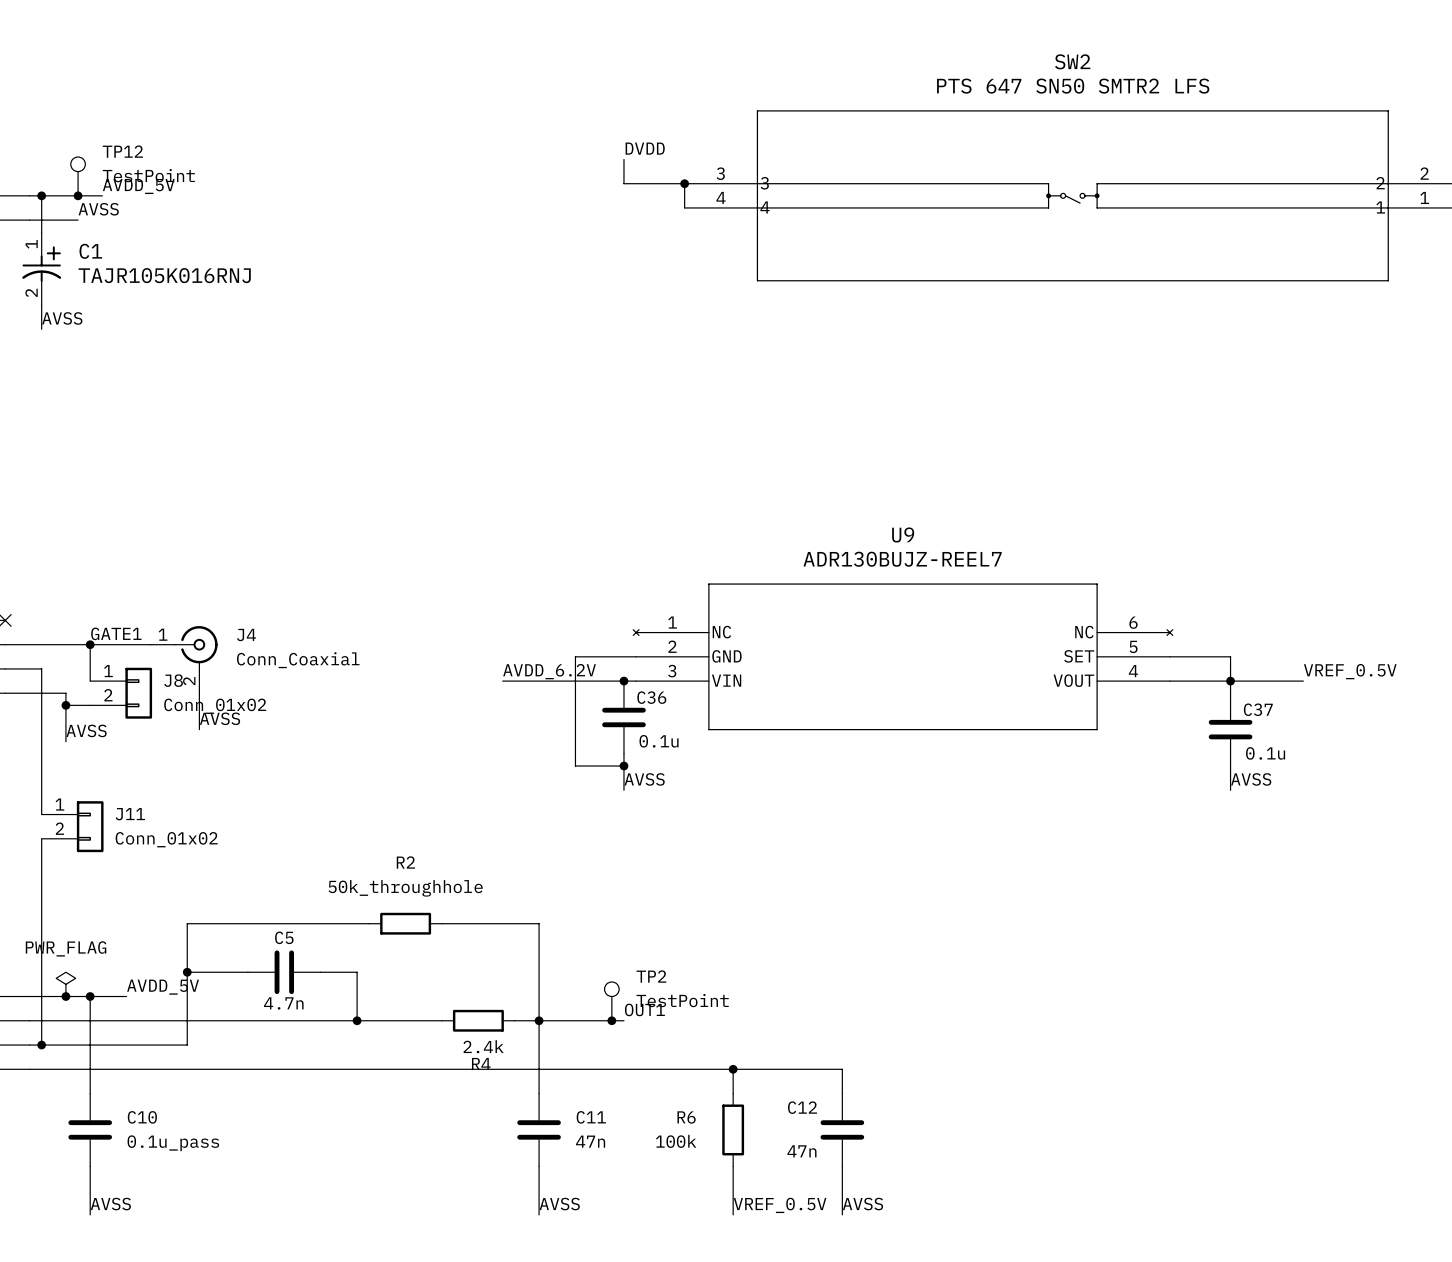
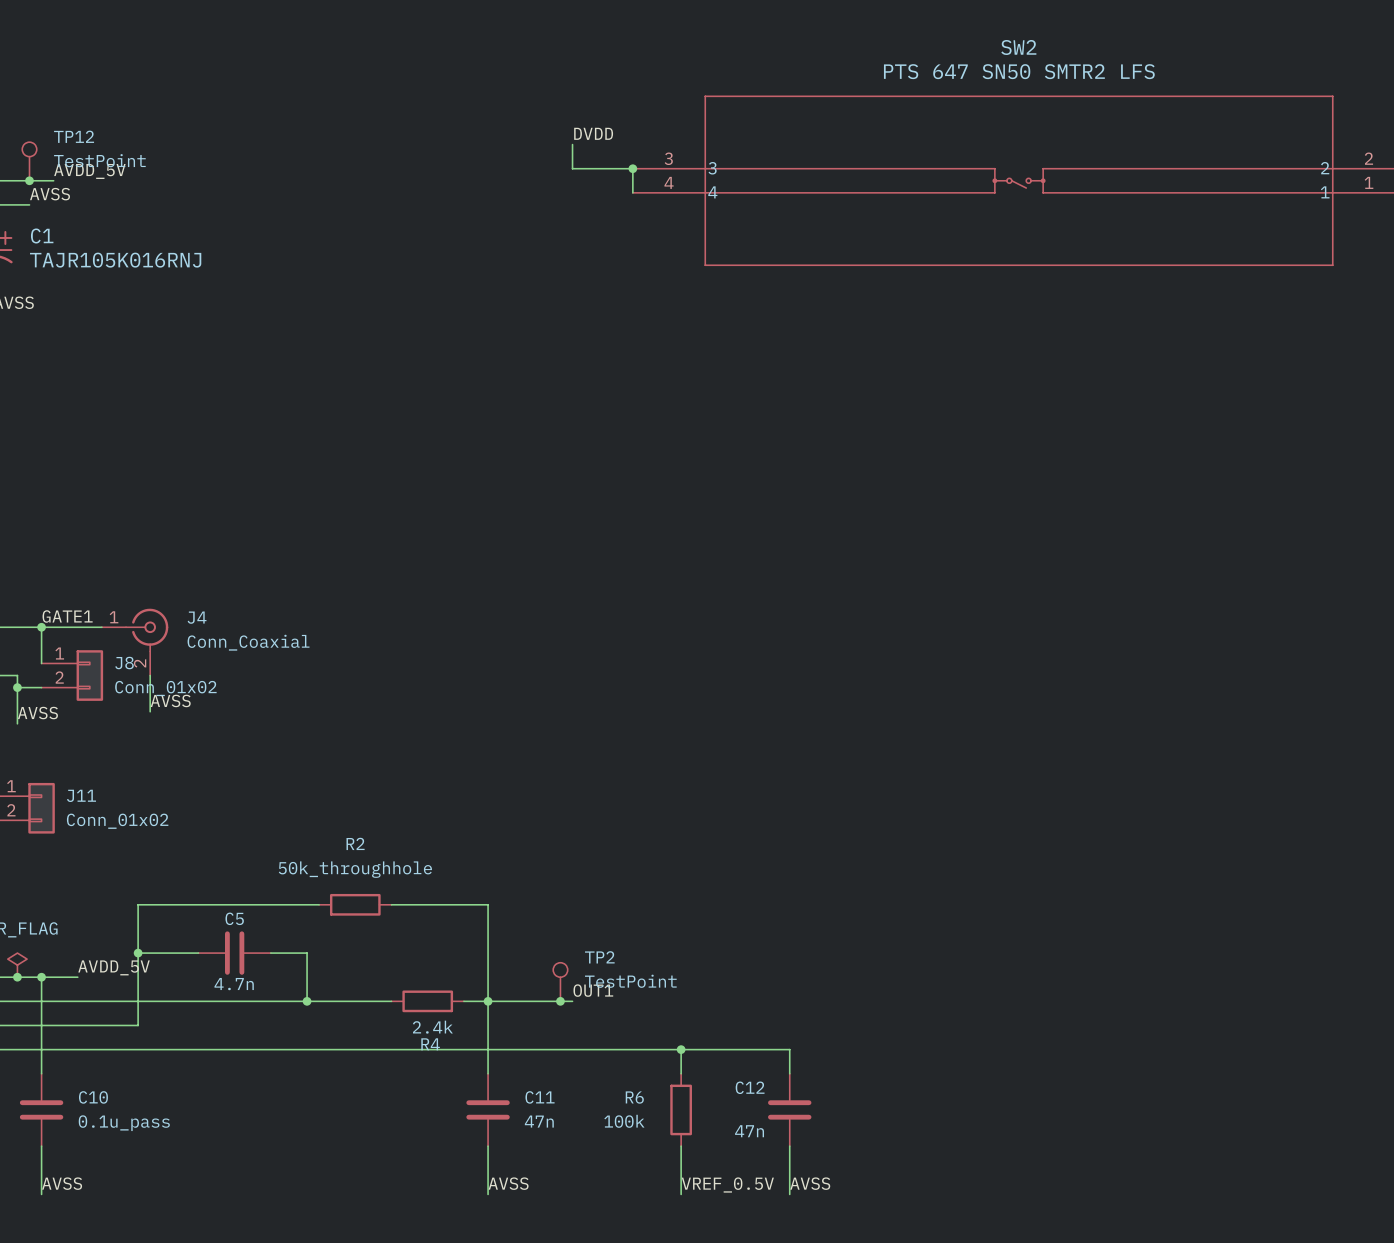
wire: (636, 656) (575, 656) (575, 766) (623, 766) -> none
U9: ADR130BUJZ-REEL7 (903, 656) -> none
wire: (1169, 656) (1230, 656) (1230, 693) -> none
label: AVDD_6.2V (549, 671) -> none
label: VREF_0.5V (1350, 671) -> none
wire: (502, 681) (636, 681) -> none
junction: (623, 681) -> none
wire: (1169, 681) (1303, 681) -> none
junction: (1230, 681) -> none
C36: 0.1u (623, 717) -> none
C37: 0.1u (1230, 729) -> none
wire: (623, 753) (623, 790) -> none
junction: (623, 766) -> none
wire: (1230, 766) (1230, 790) -> none
label: AVSS (644, 779) -> none
label: AVSS (1251, 779) -> none

